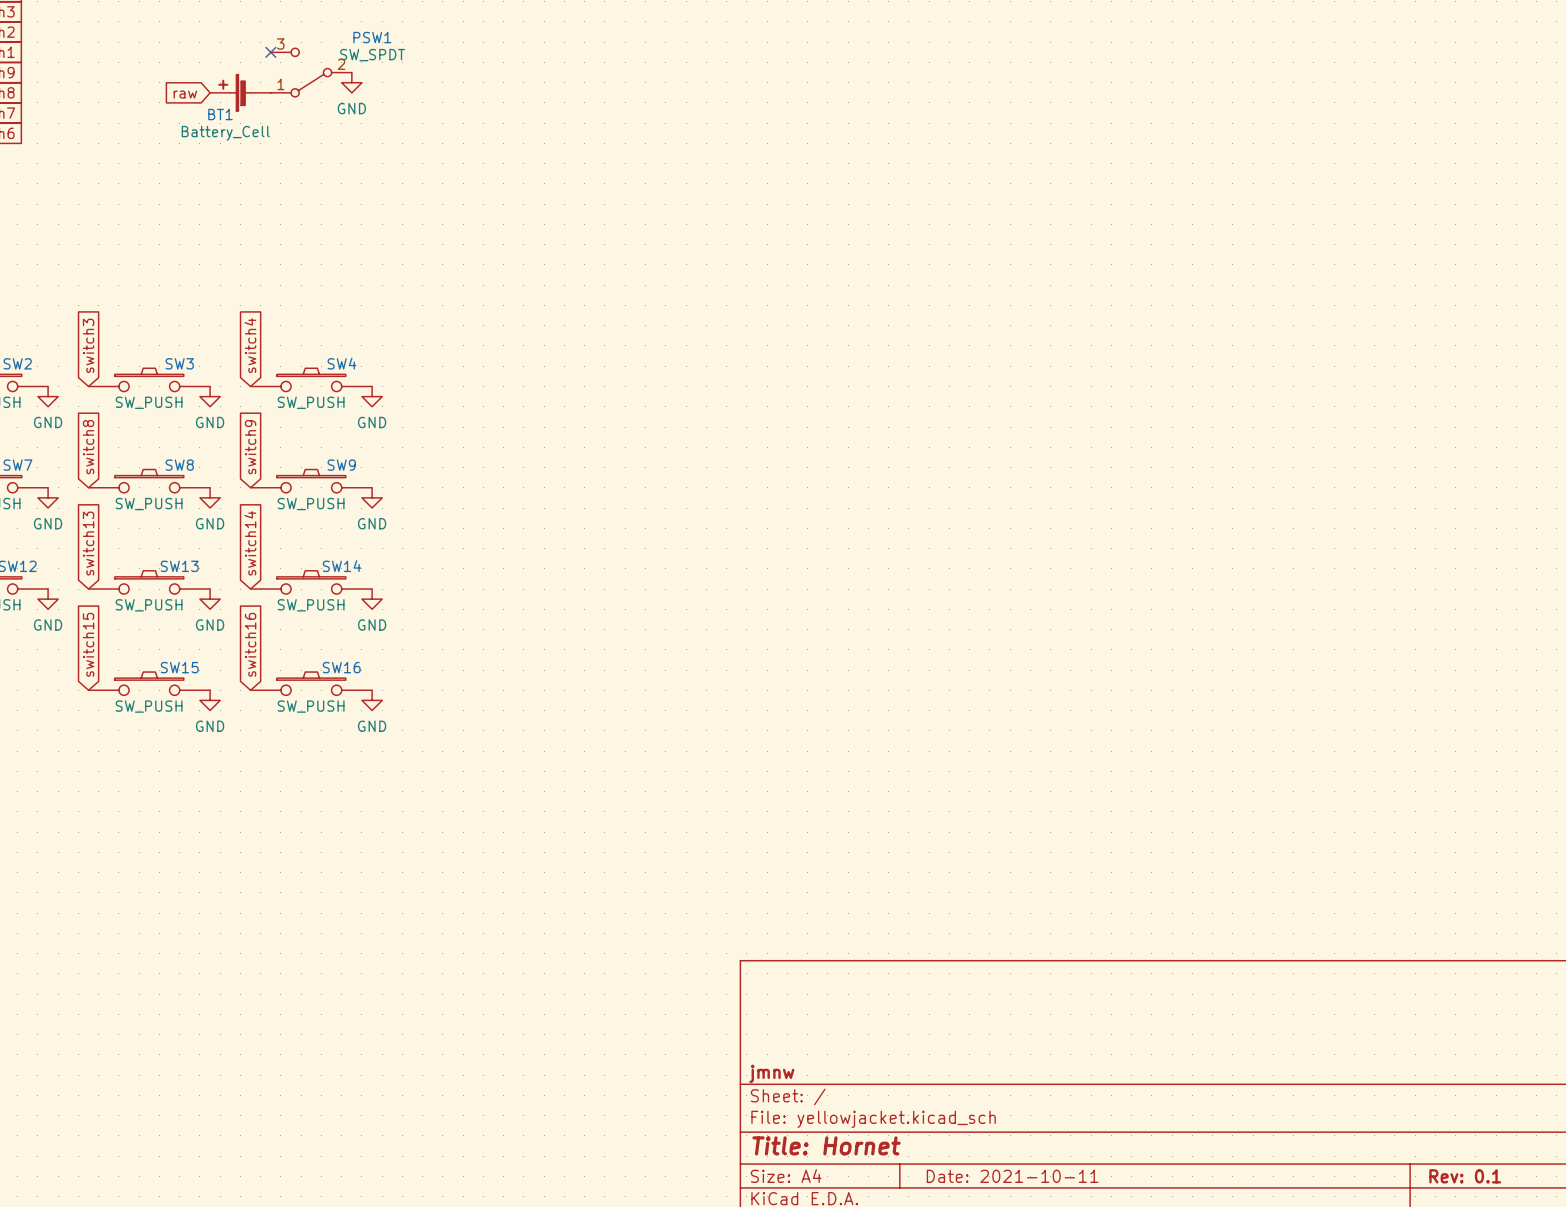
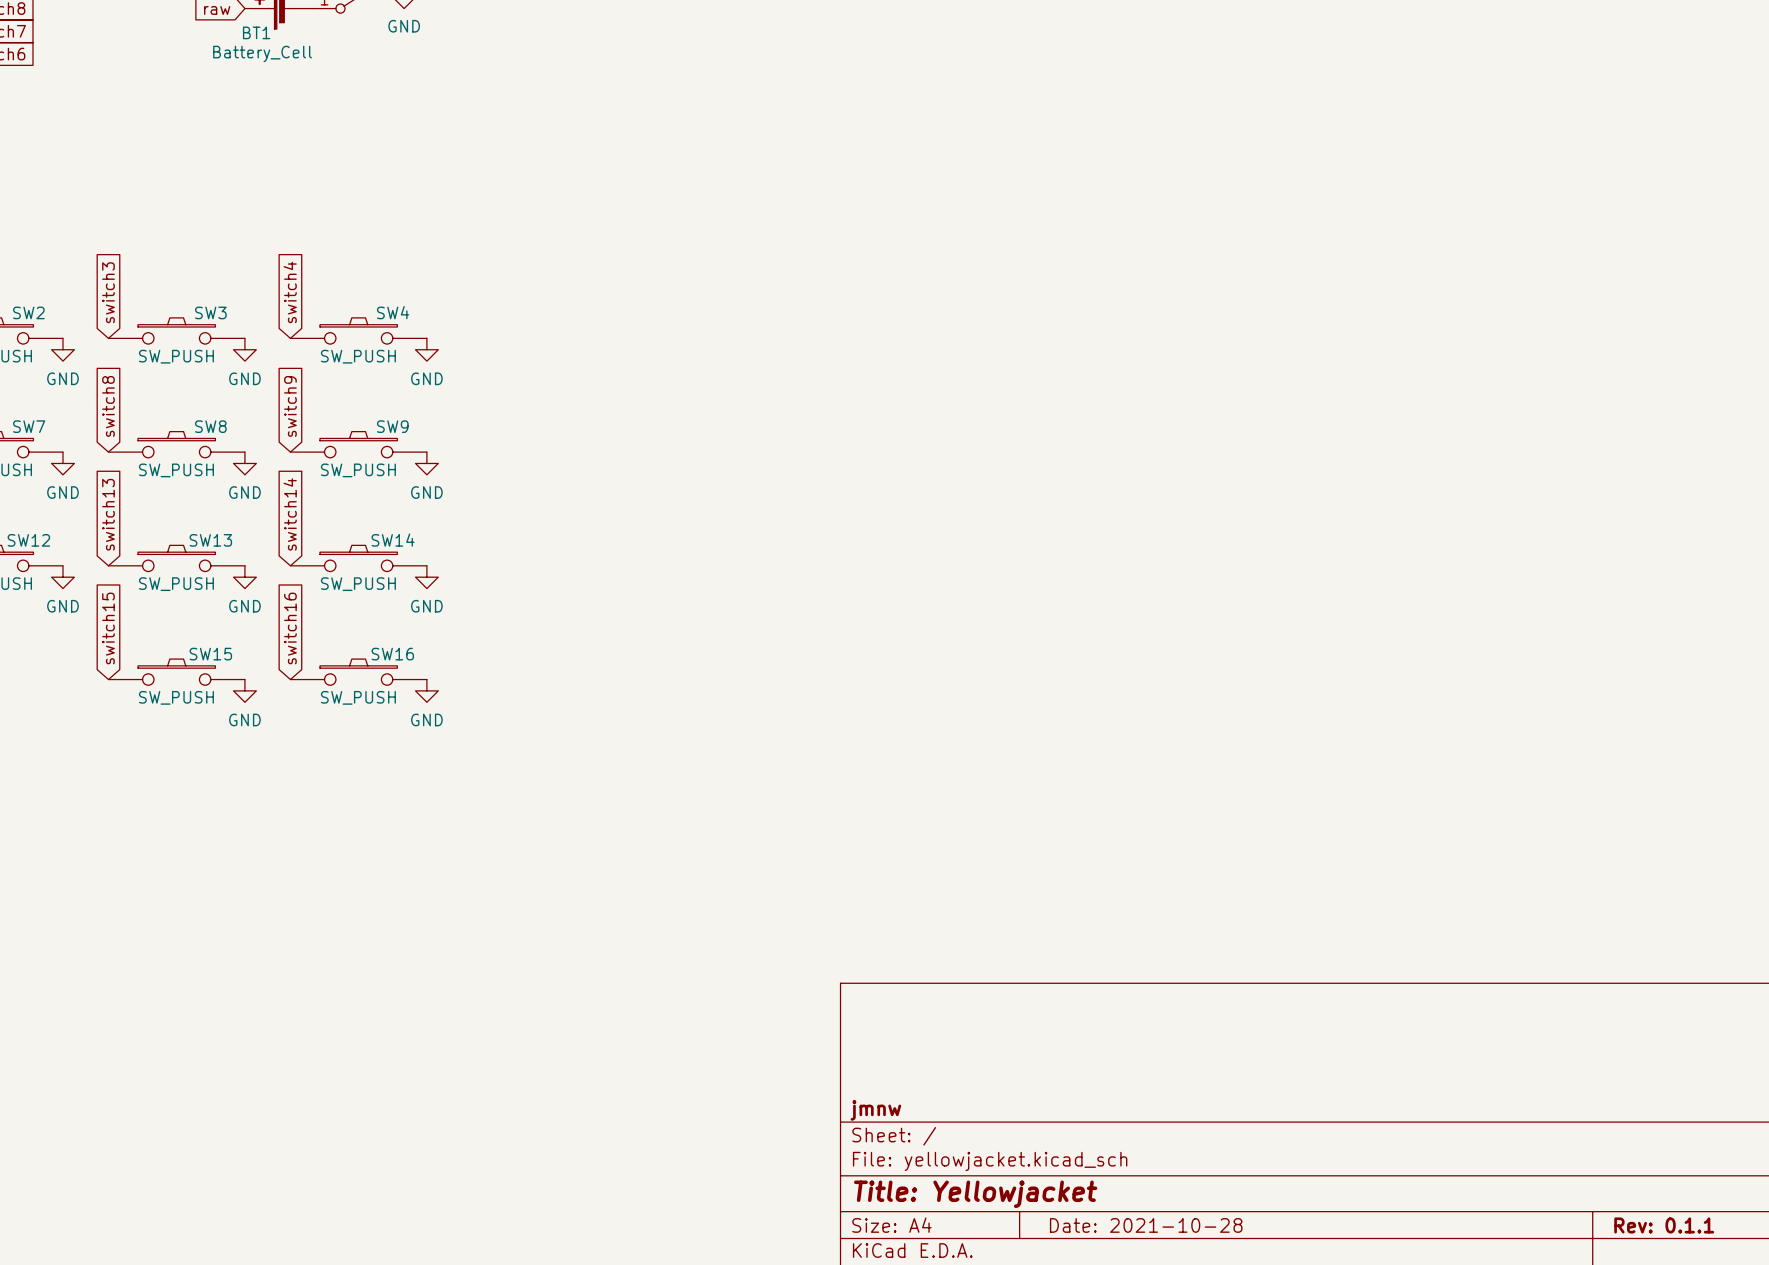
title block: Title: Hornet (826, 1145) -> Title: Yellowjacket (975, 1194)
title block: Date: 2021-10-11 (1012, 1176) -> Date: 2021-10-28 (1146, 1225)
title block: Rev: 0.1 (1465, 1176) -> Rev: 0.1.1 (1664, 1225)

